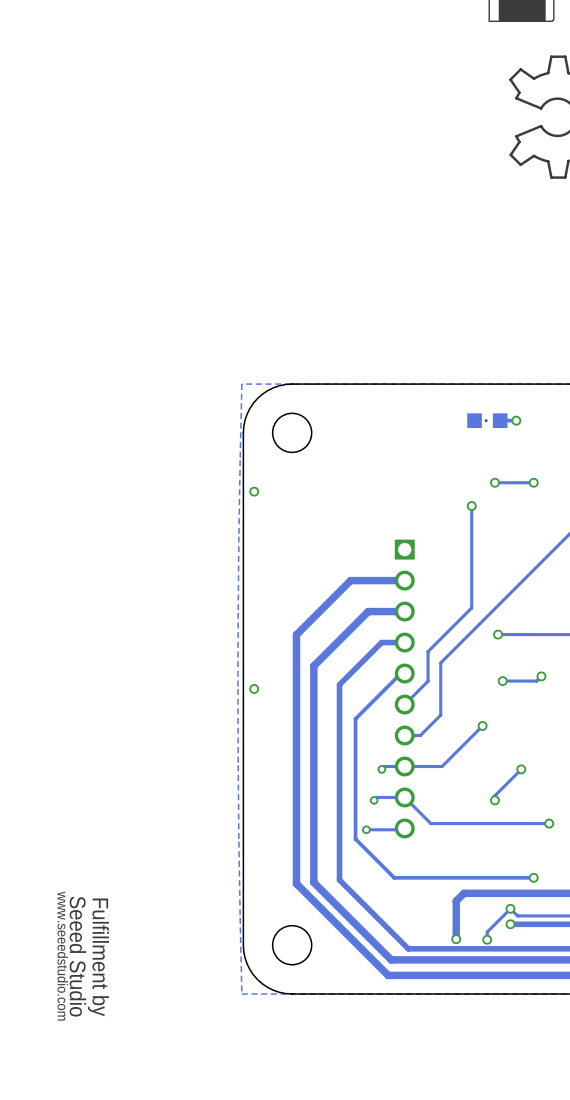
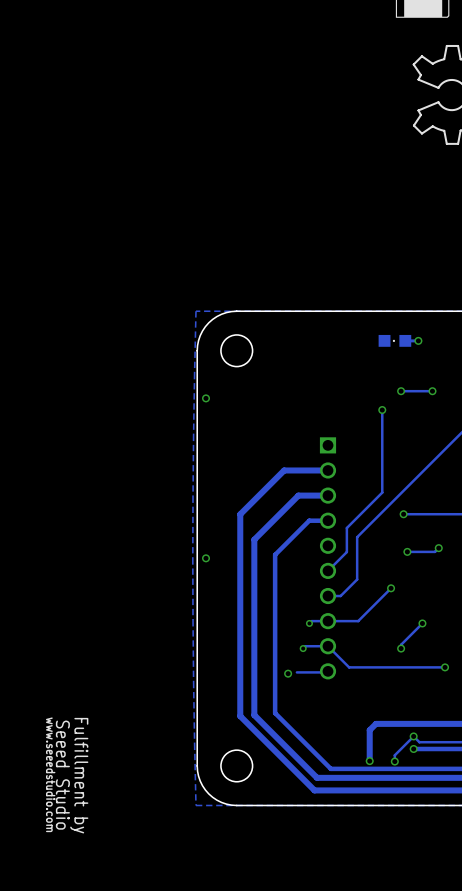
track: (404, 673) (400, 673) (355, 718) (355, 839) (394, 877) (533, 877) -> none
via: (366, 829) -> none
via: none -> (288, 673)
via: (533, 877) -> none

